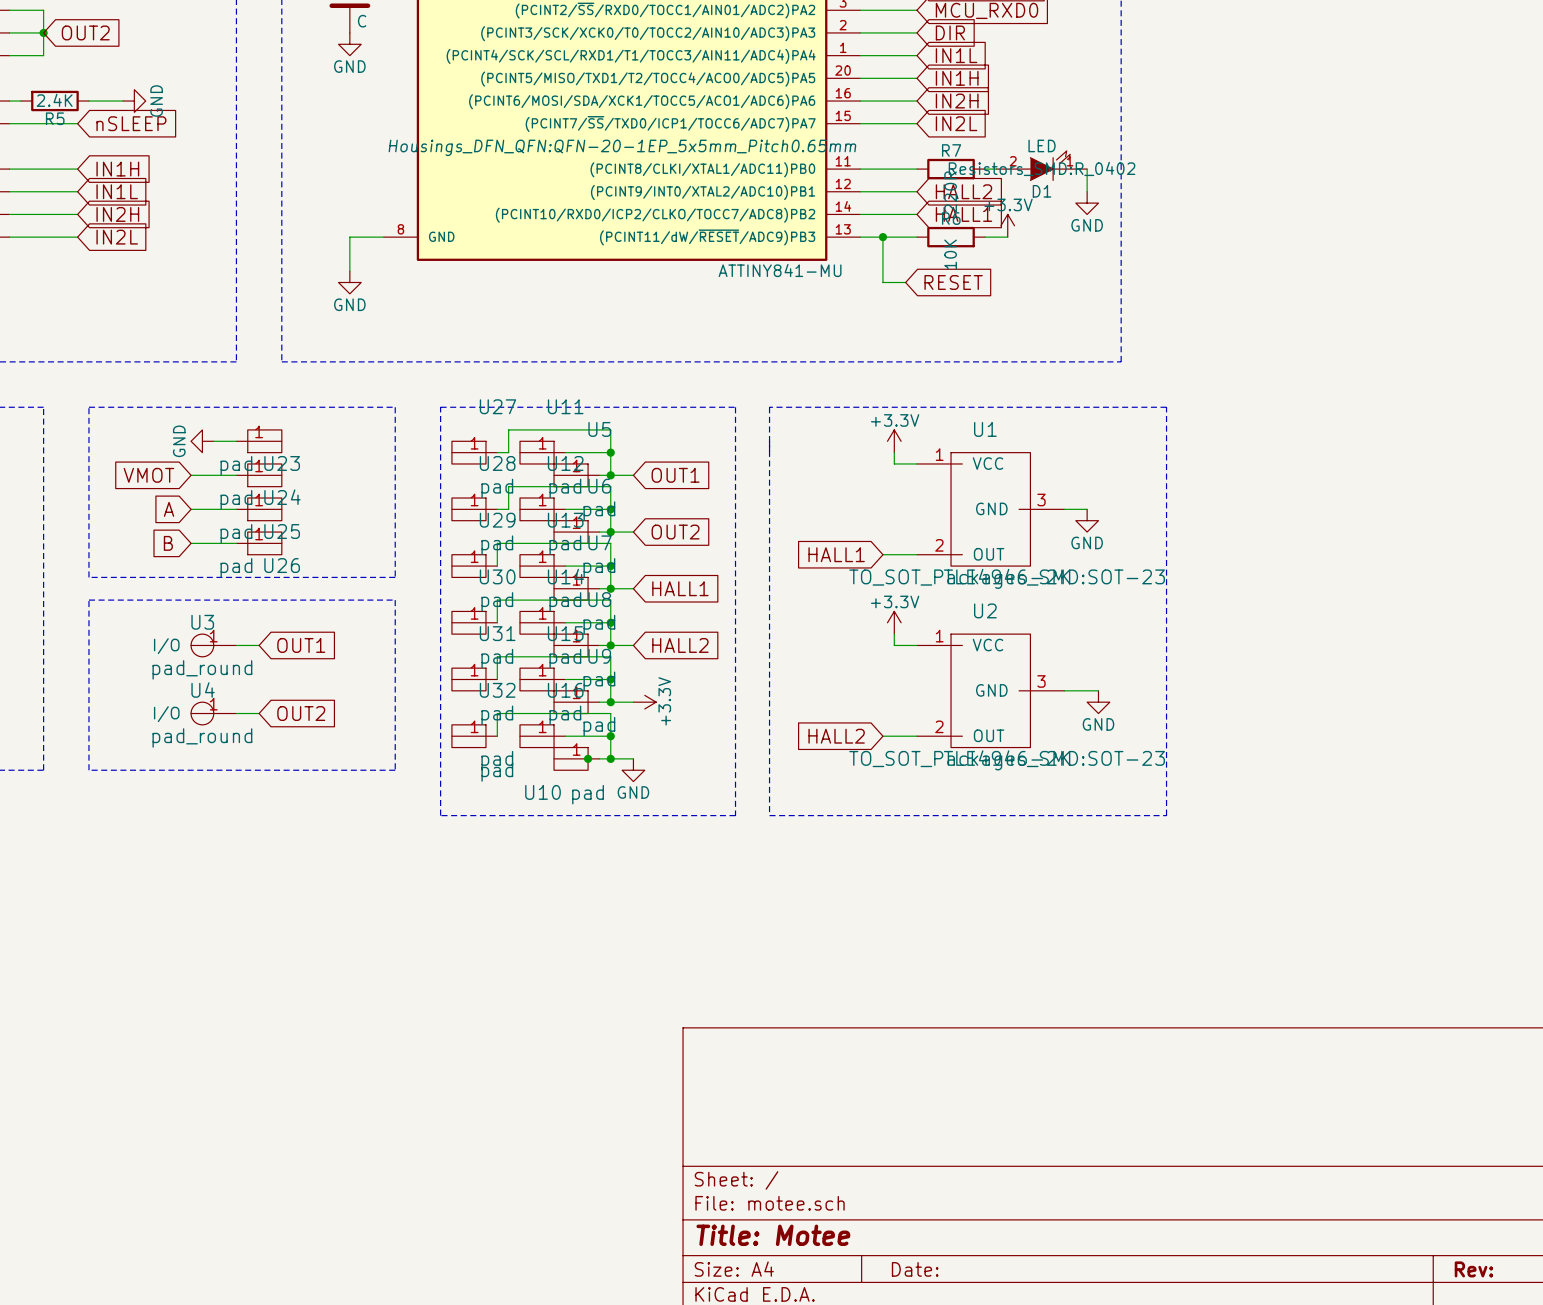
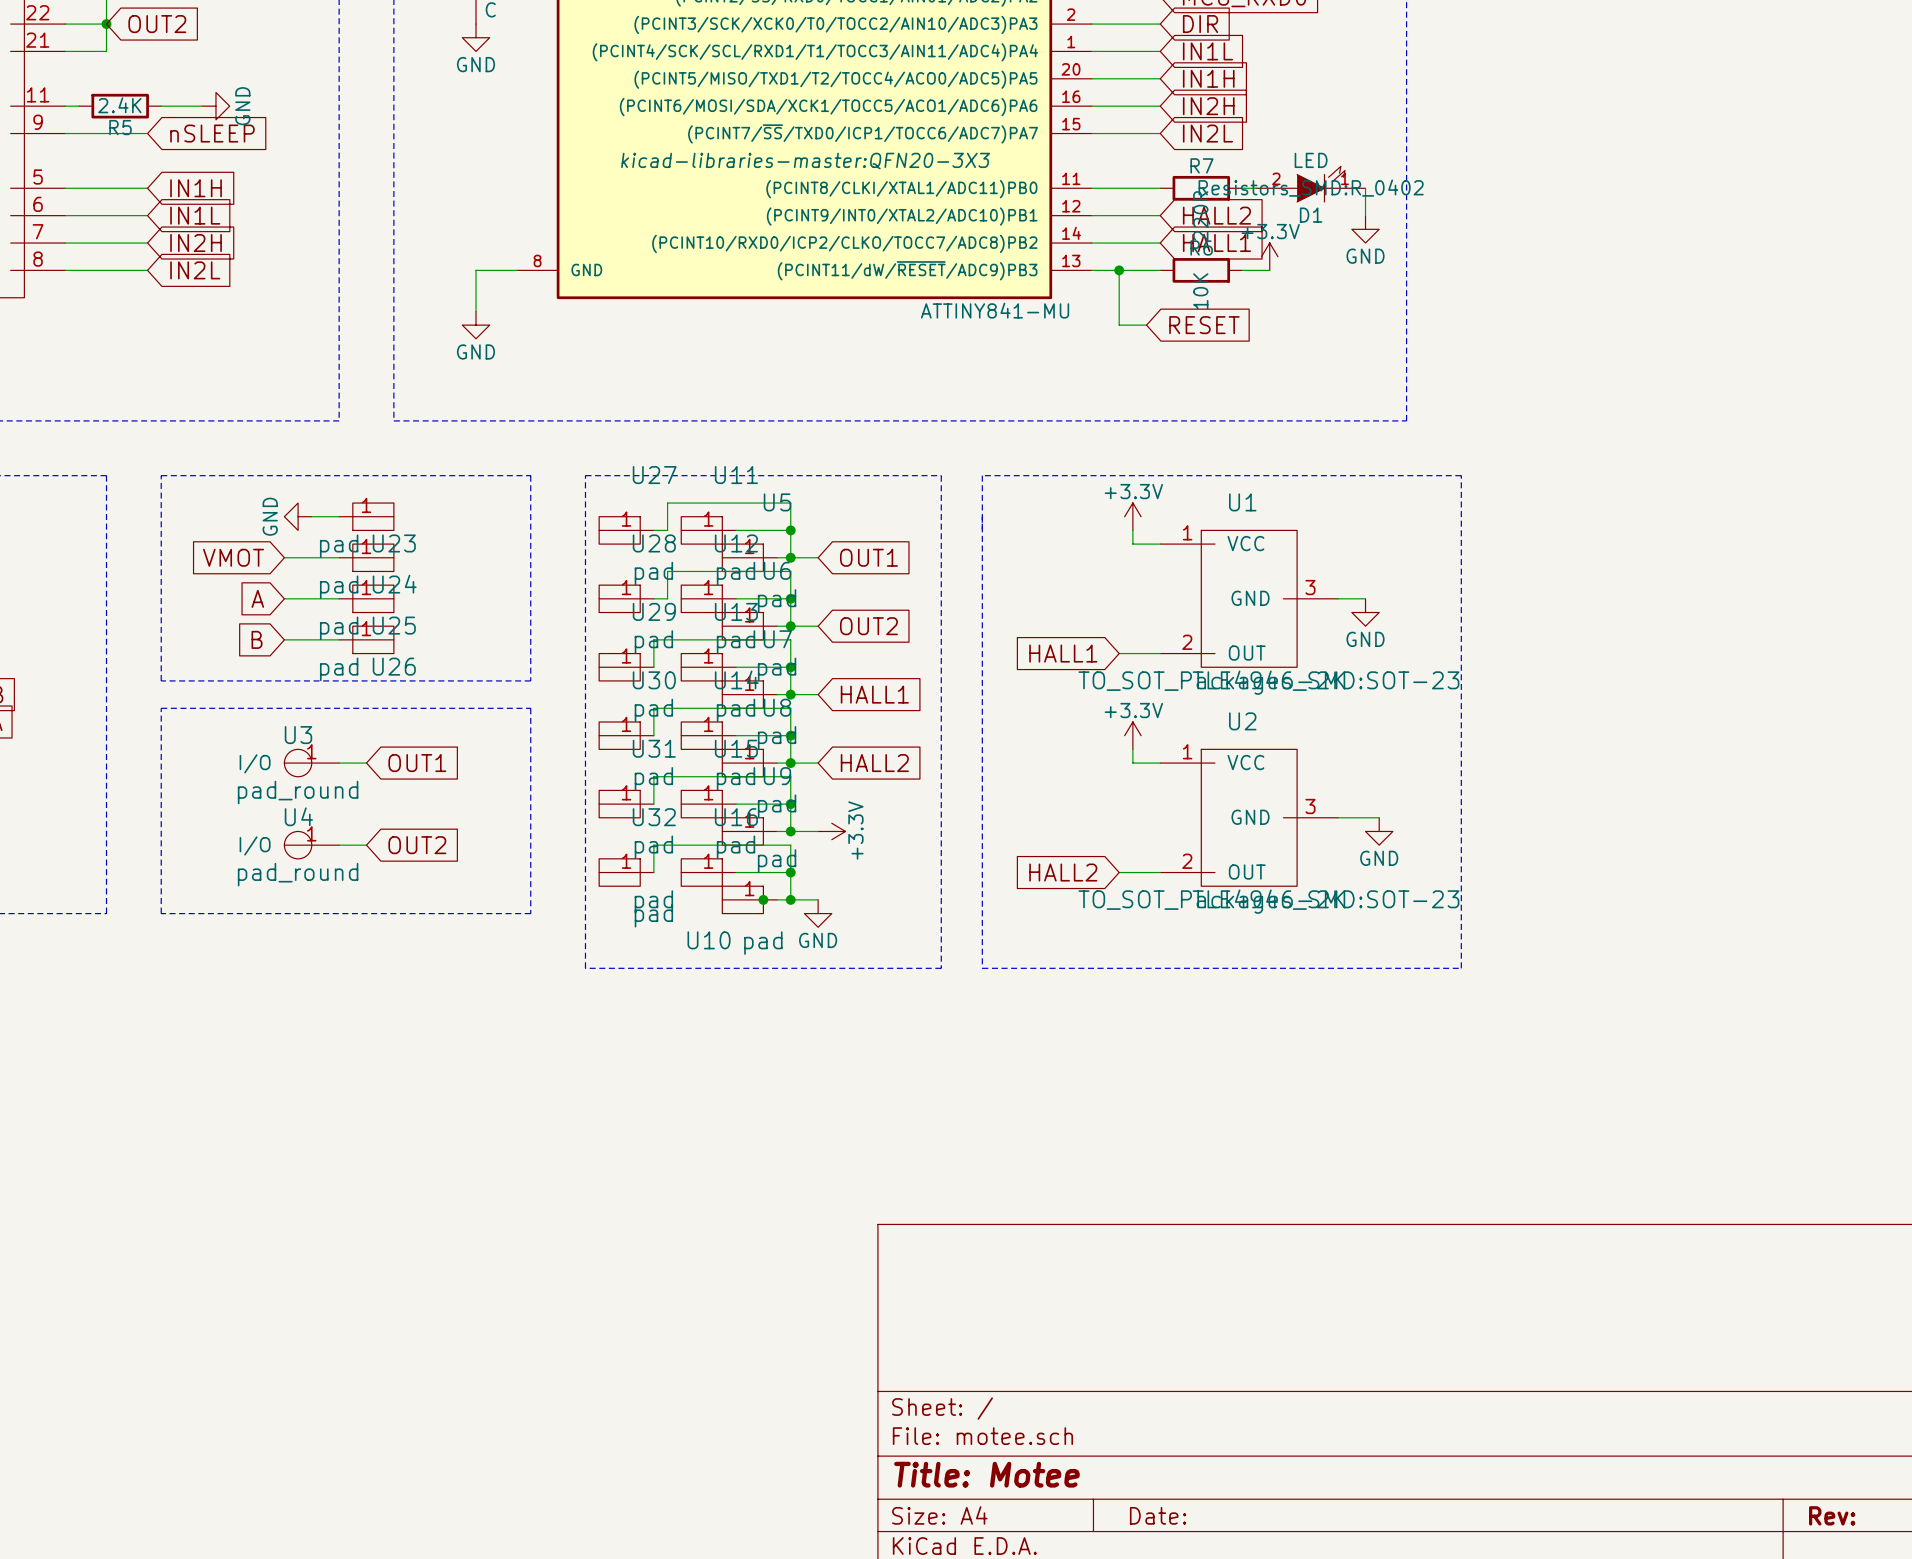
part text: Housings_DFN_QFN:QFN-20-1EP_5x5mm_Pitch0.65mm (622, 147) -> kicad-libraries-master:QFN20-3X3 (805, 161)

